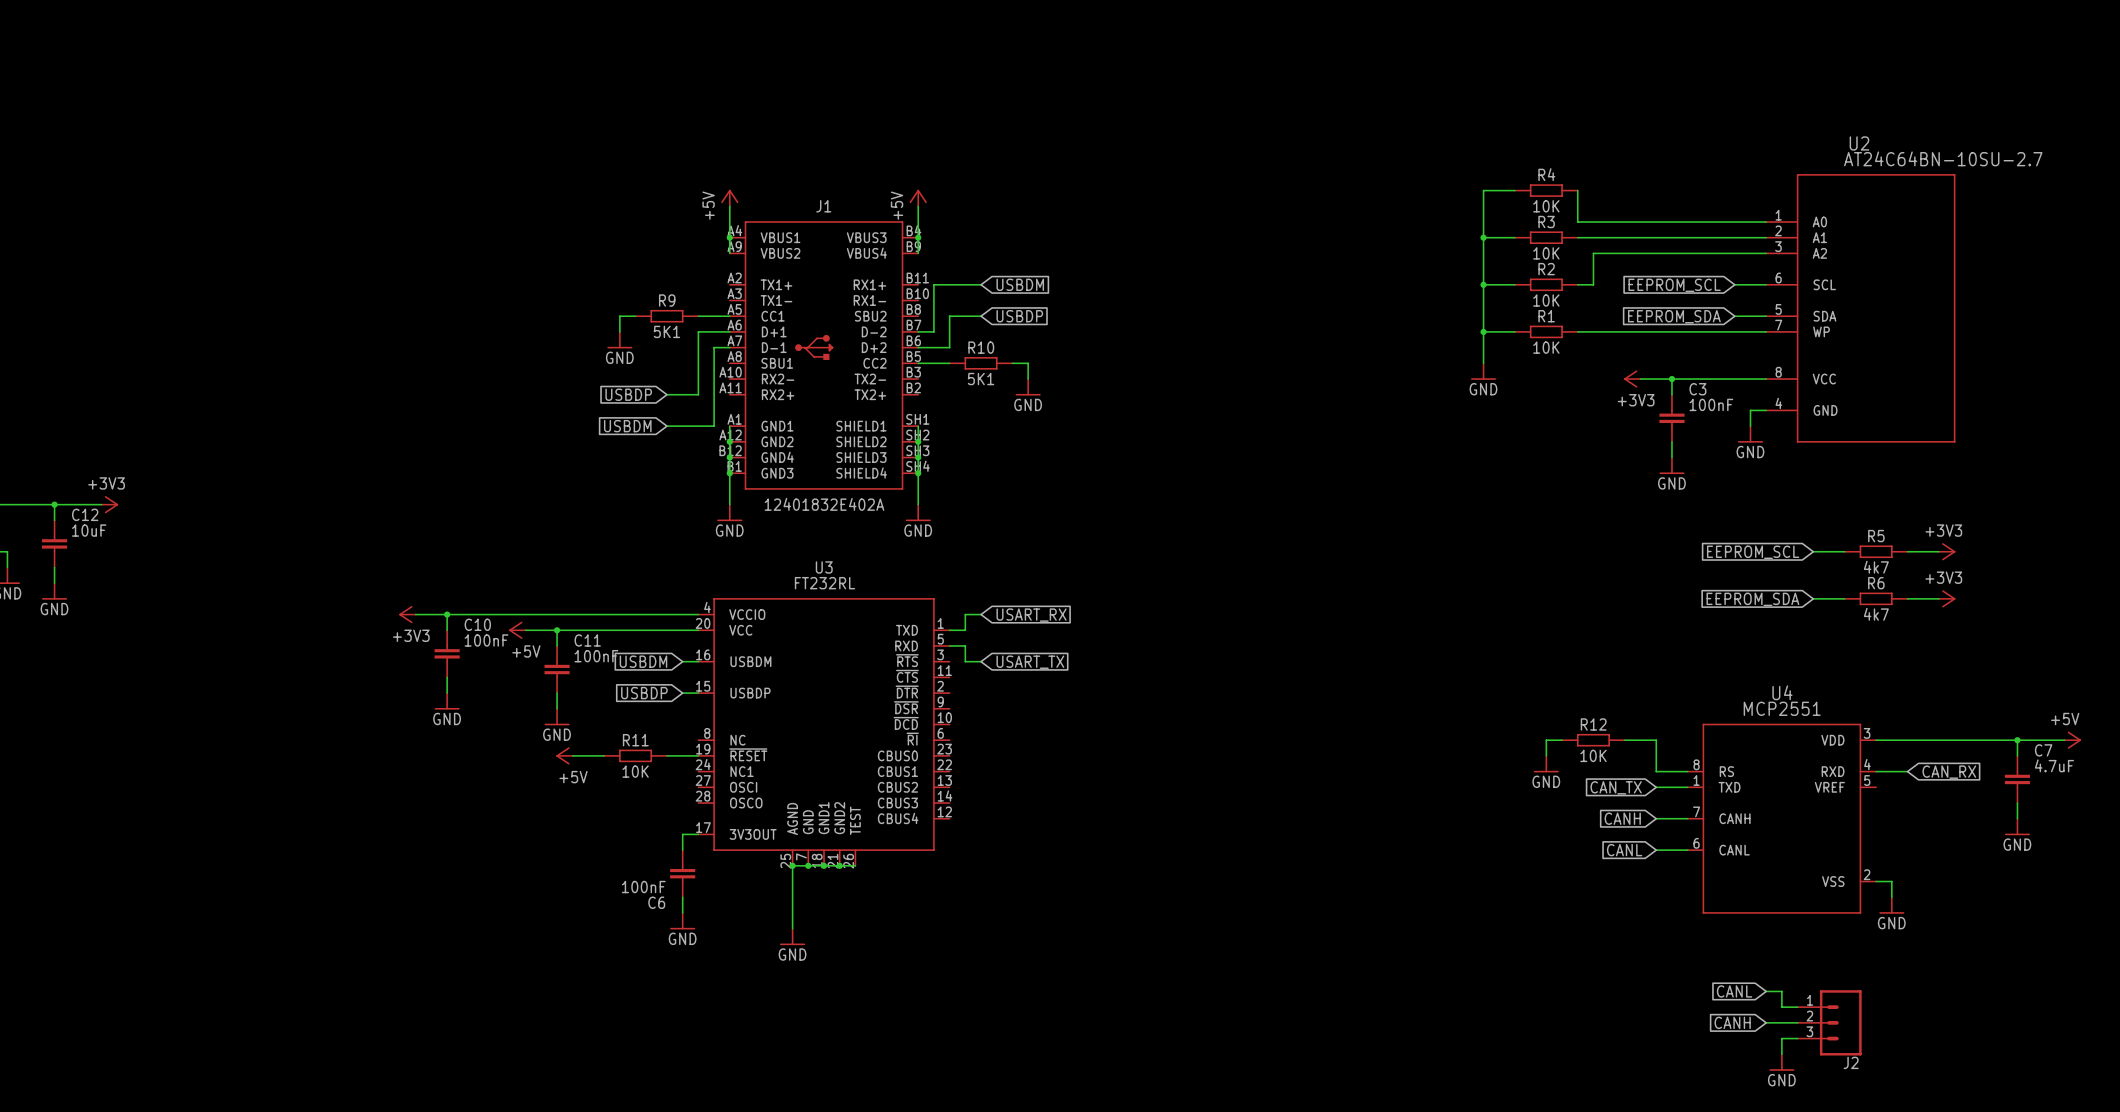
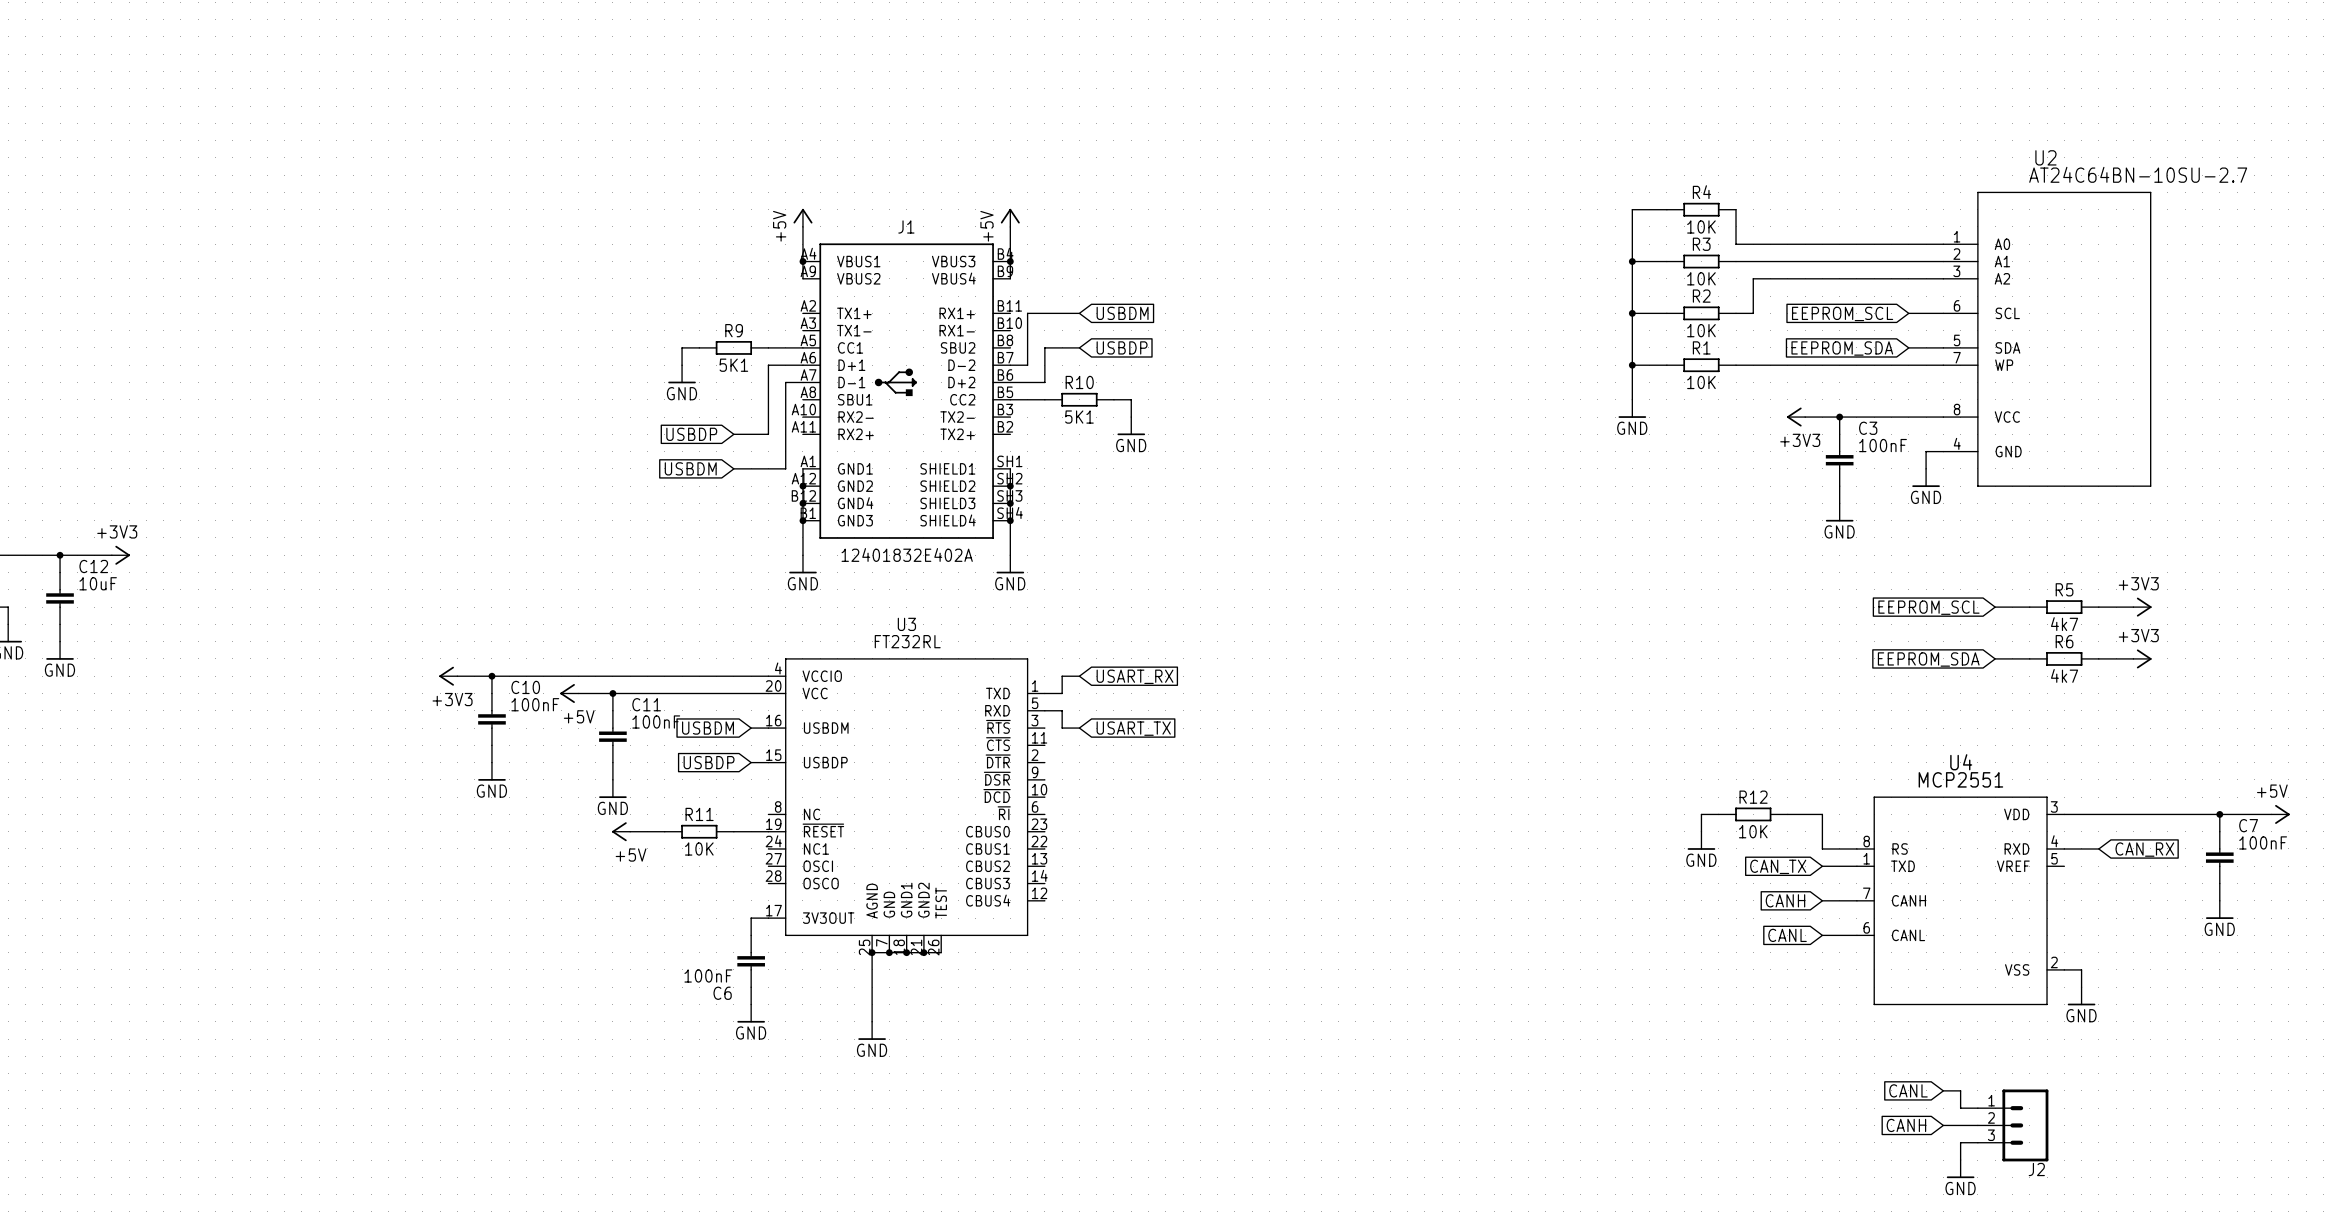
C7 value: 4.7uF (2054, 765) -> 100nF (2263, 842)

